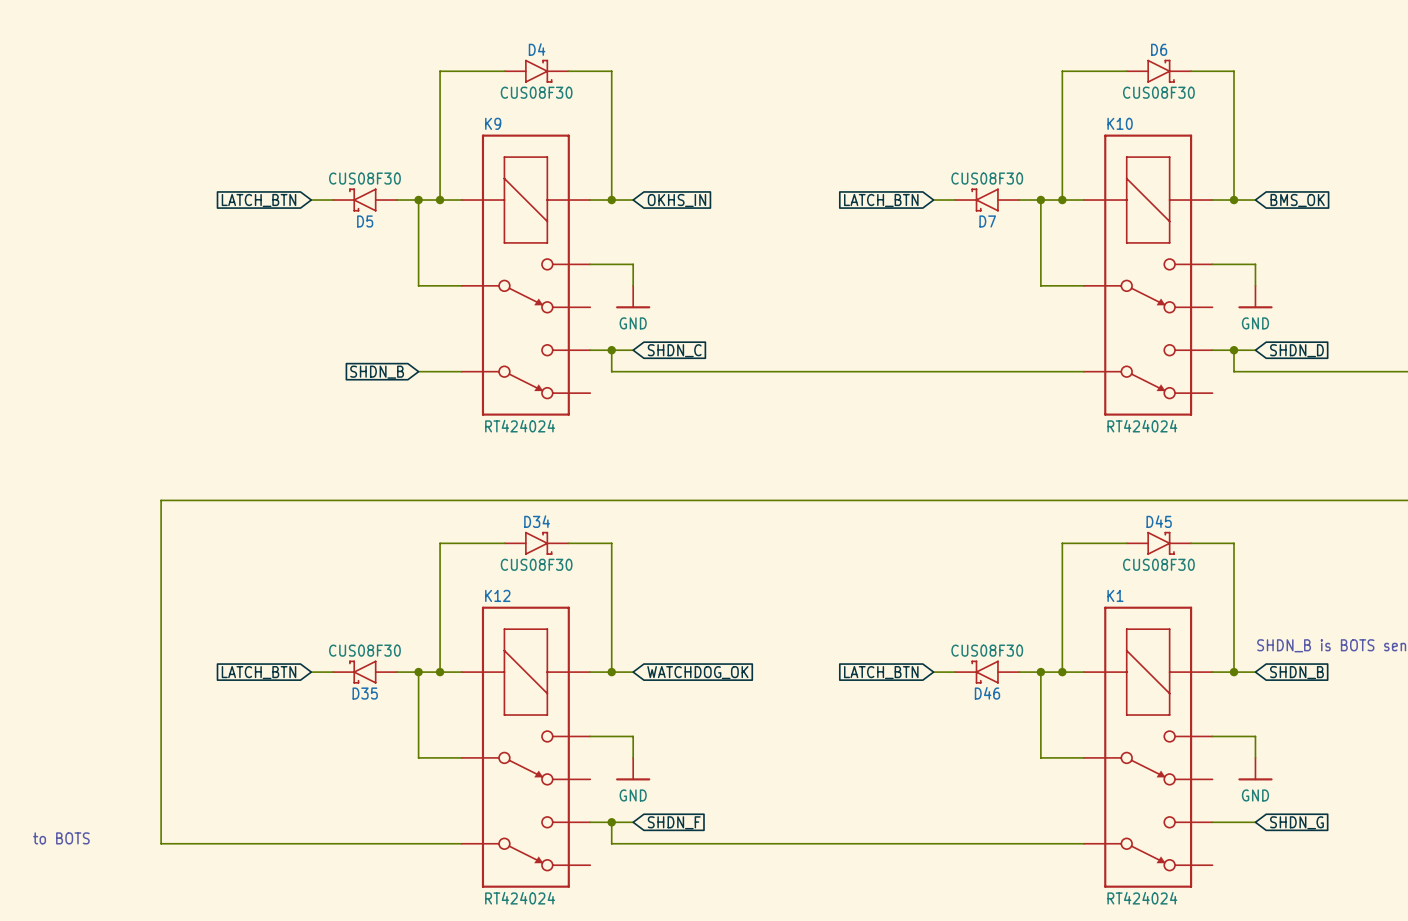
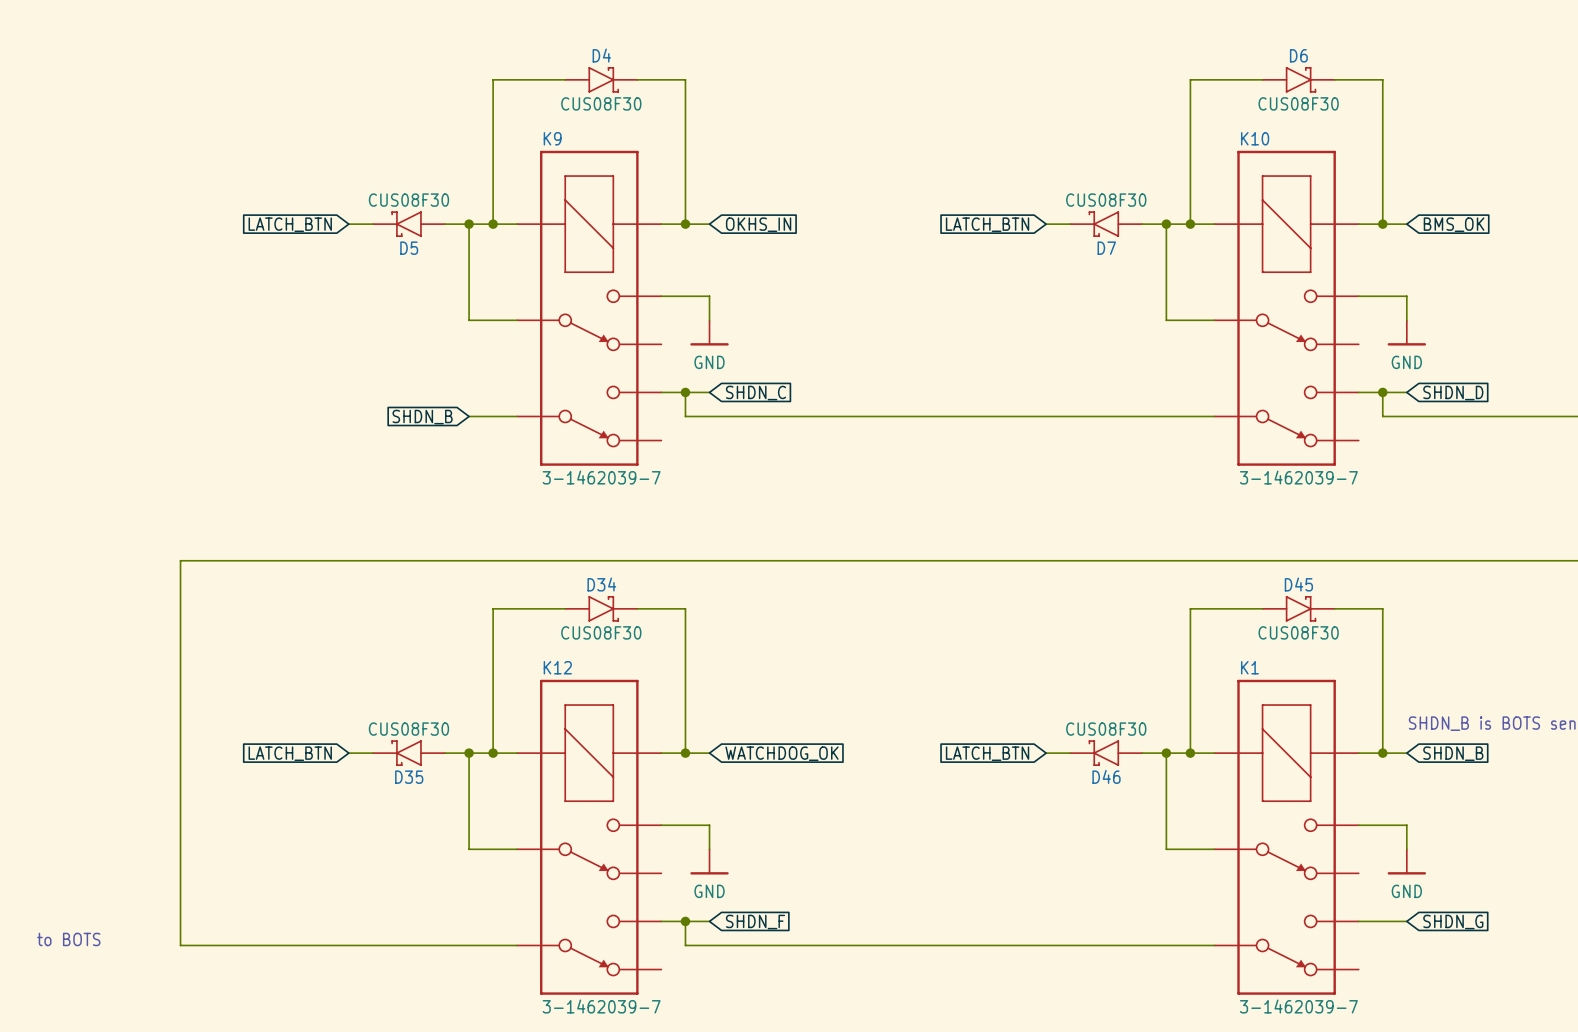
K9 text: RT424024 (520, 426) -> 3-1462039-7 (601, 477)
K10 text: RT424024 (1142, 426) -> 3-1462039-7 (1298, 477)
K12 text: RT424024 (520, 898) -> 3-1462039-7 (601, 1006)
K1 text: RT424024 (1142, 898) -> 3-1462039-7 (1298, 1006)

